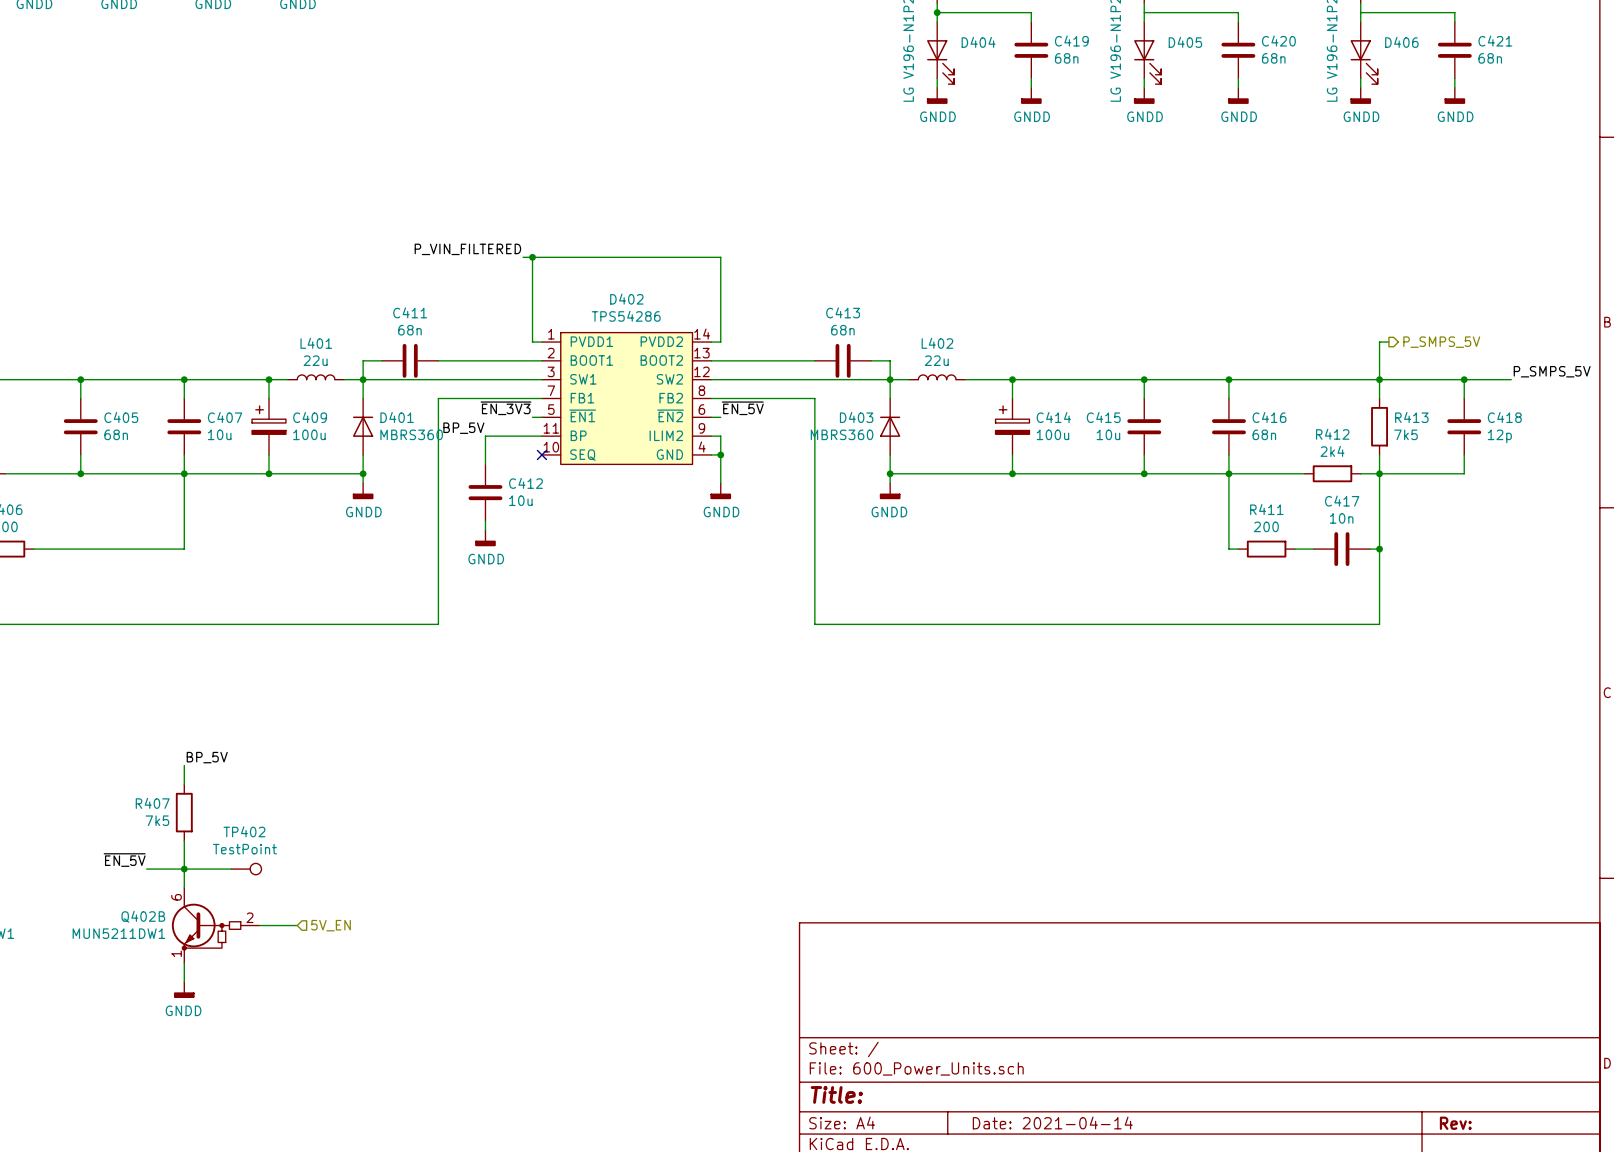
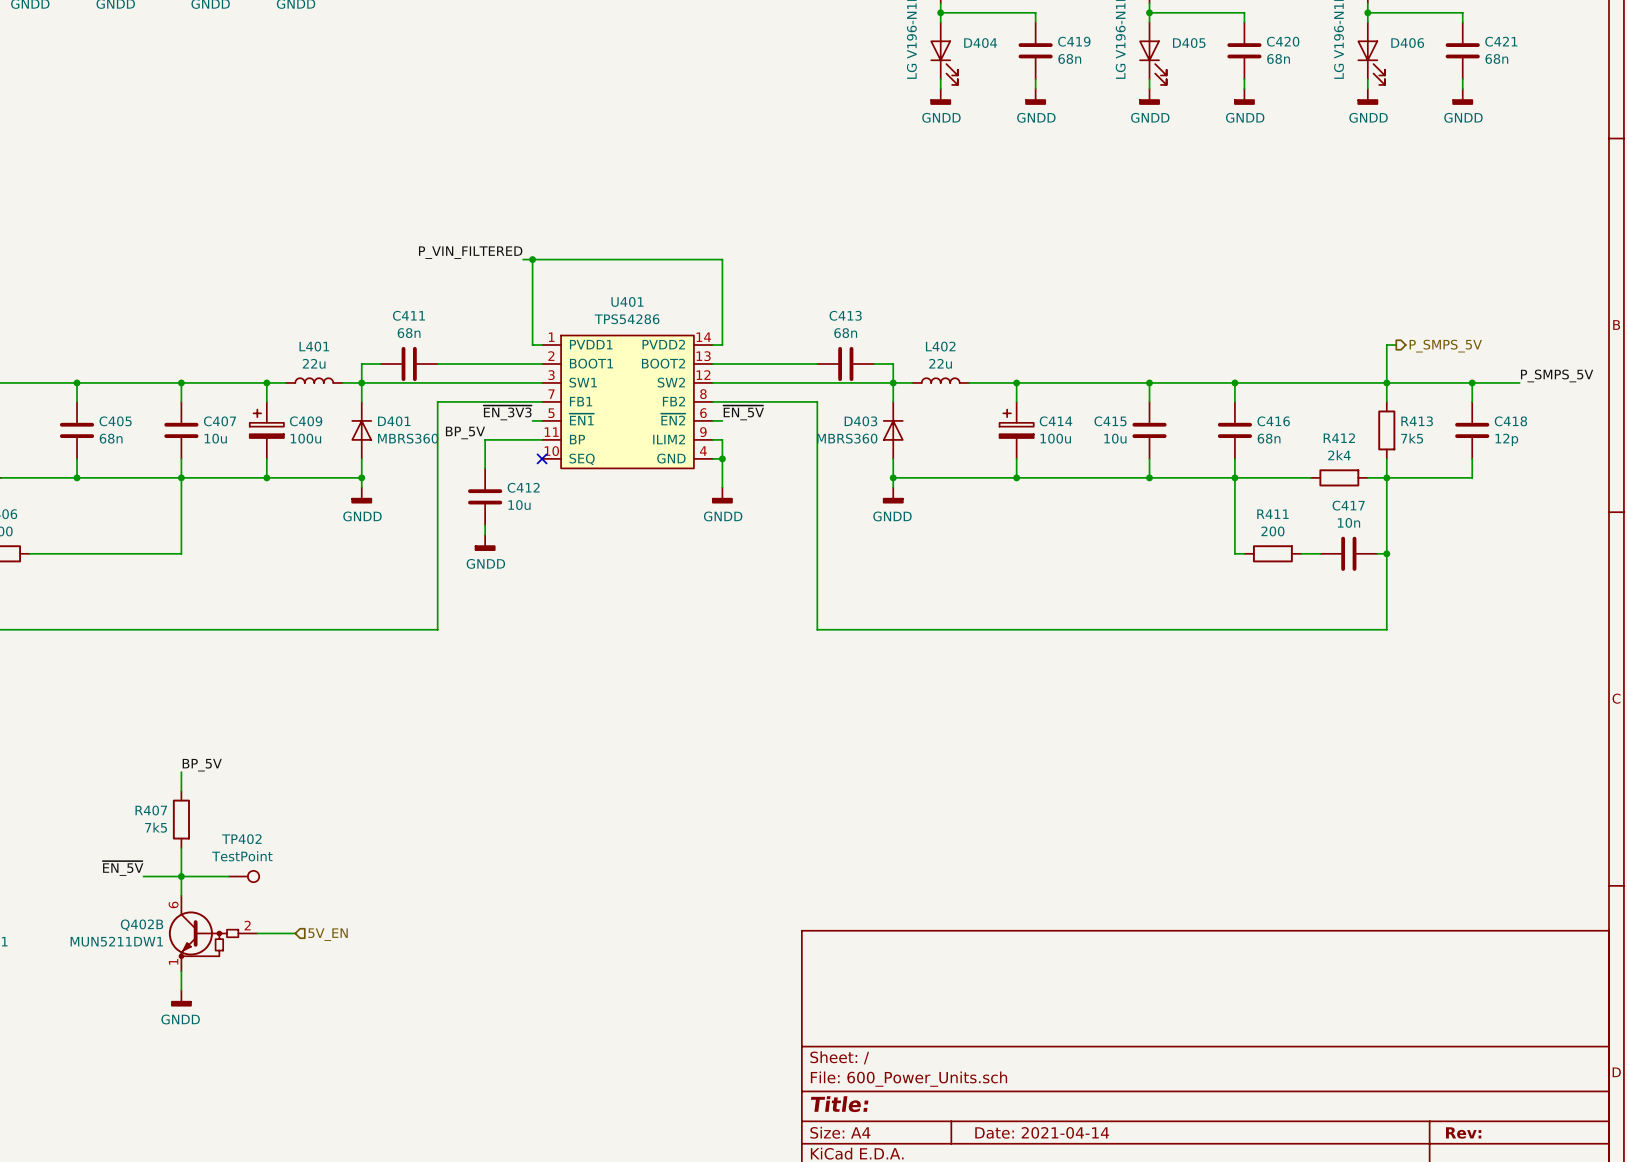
junction: none -> (1149, 12)
junction: none -> (1367, 12)
D402 name: D402 (626, 299) -> U401 (627, 301)

